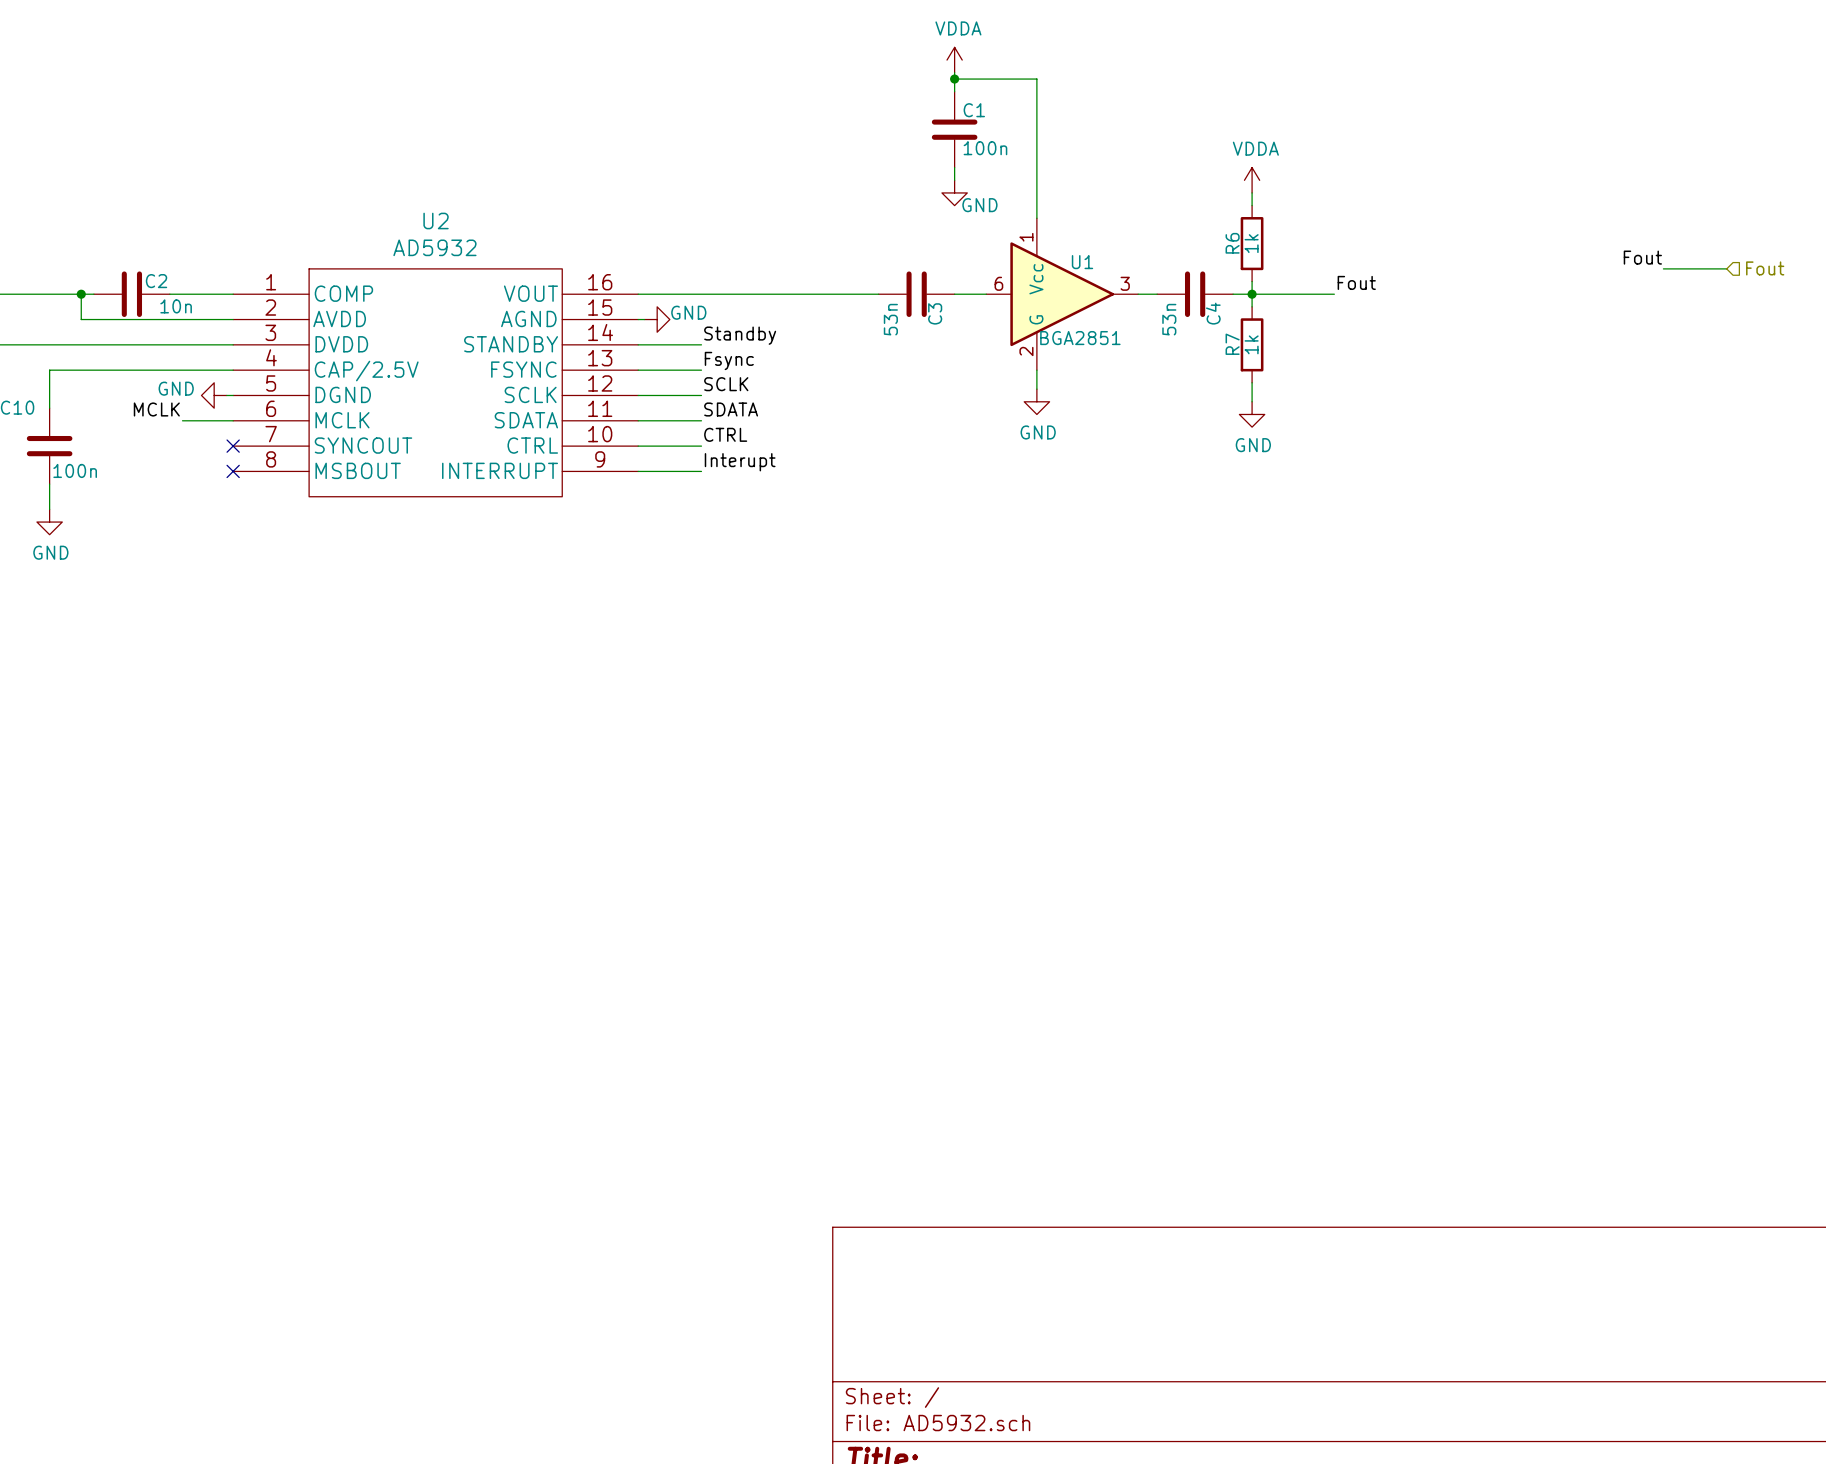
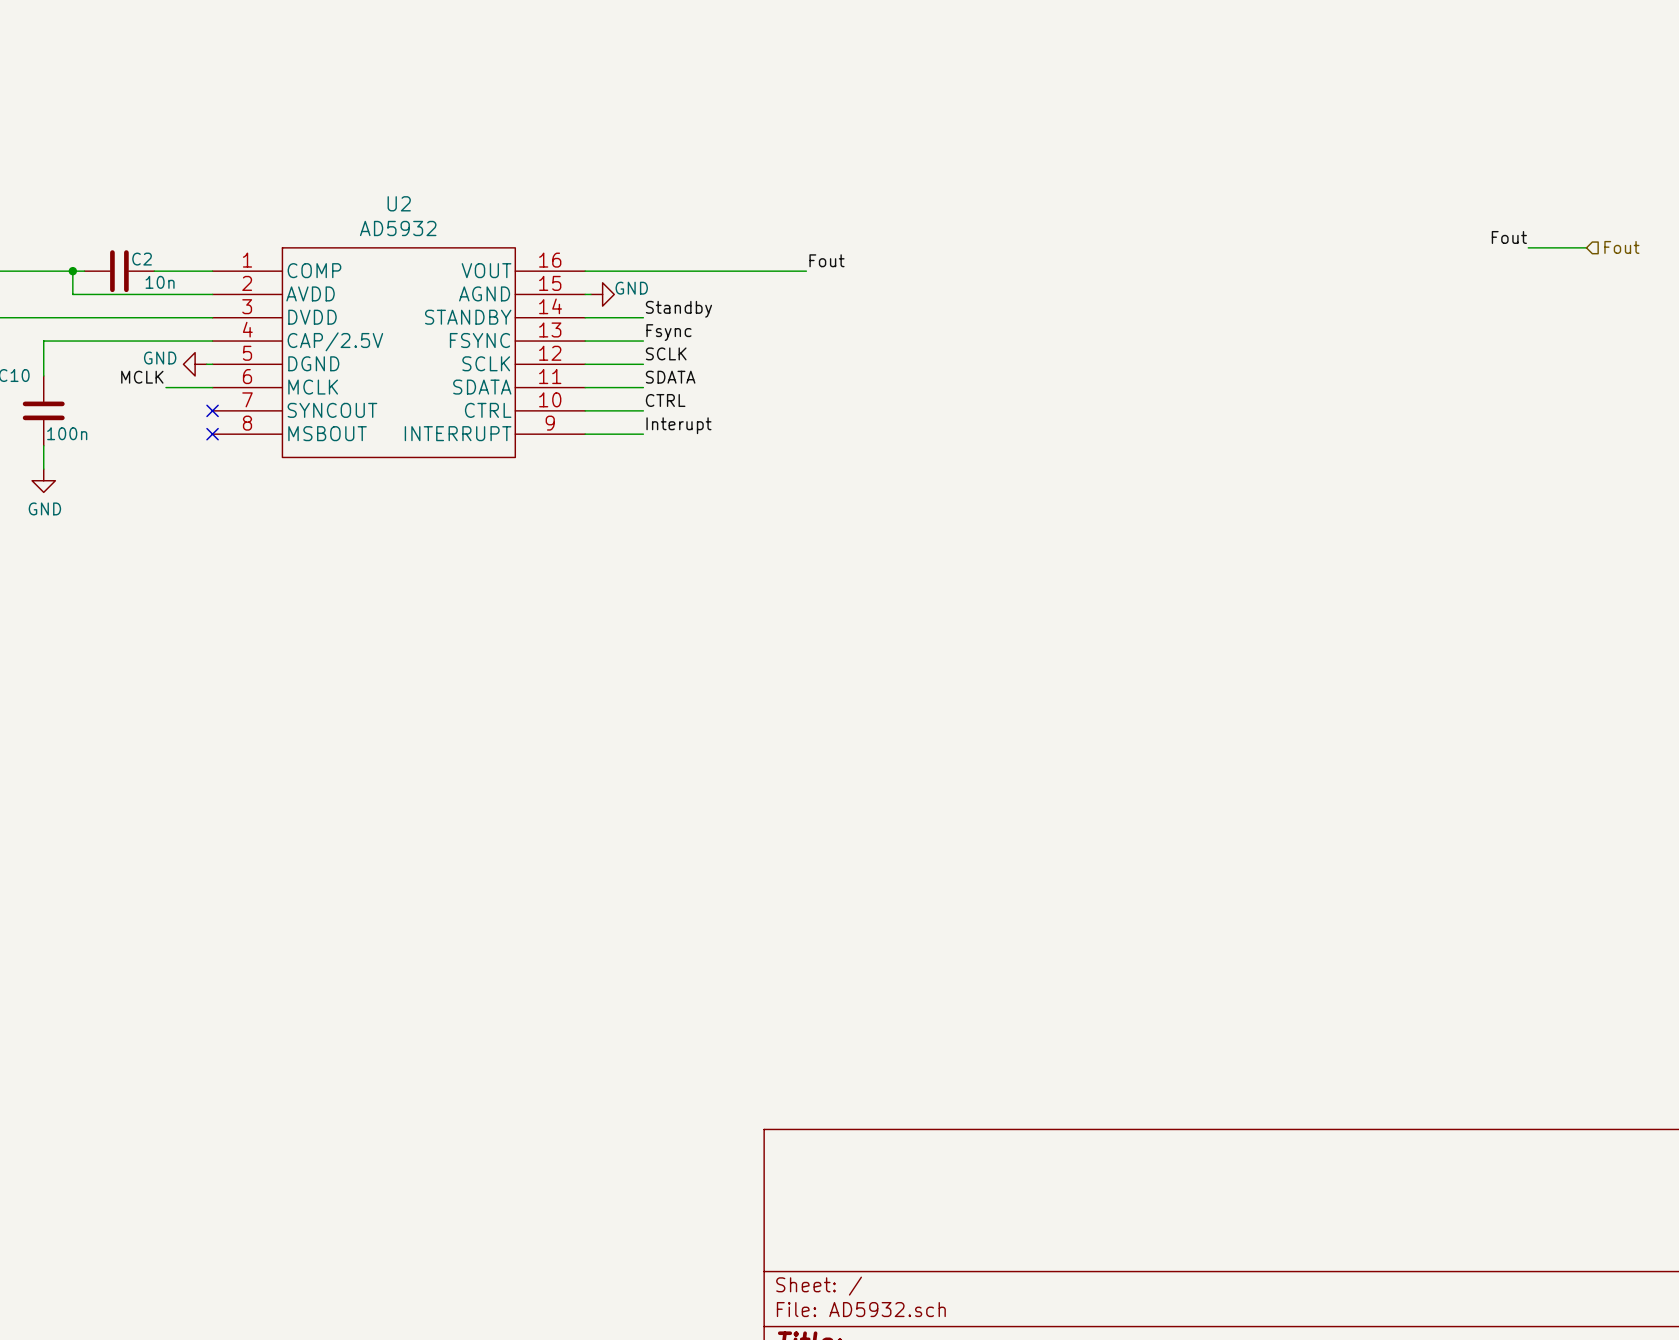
power symbol: VDDA (954, 60) -> none
wire: (954, 72) (954, 91) -> none
wire: (954, 79) (1036, 79) (1036, 218) -> none
junction: (954, 79) -> none
C1: 100n (954, 129) -> none
wire: (954, 167) (954, 180) -> none
power symbol: VDDA (1252, 180) -> none
power symbol: GND (954, 192) -> none
wire: (1252, 192) (1252, 205) -> none
R6: 1k (1252, 243) -> none
wire: (1252, 281) (1252, 306) -> none
label: none -> Fout (826, 260)
label: Fout (1356, 282) -> none
C3: 53n (916, 294) -> none
wire: (954, 294) (986, 294) -> none
U1: BGA2851 (1062, 294) -> none
wire: (1138, 294) (1157, 294) -> none
C4: 53n (1195, 294) -> none
wire: (1233, 294) (1334, 294) -> none
junction: (1252, 294) -> none
R7: 1k (1252, 344) -> none
wire: (1036, 370) (1036, 389) -> none
wire: (1252, 382) (1252, 401) -> none
power symbol: GND (1036, 401) -> none
power symbol: GND (1252, 414) -> none

